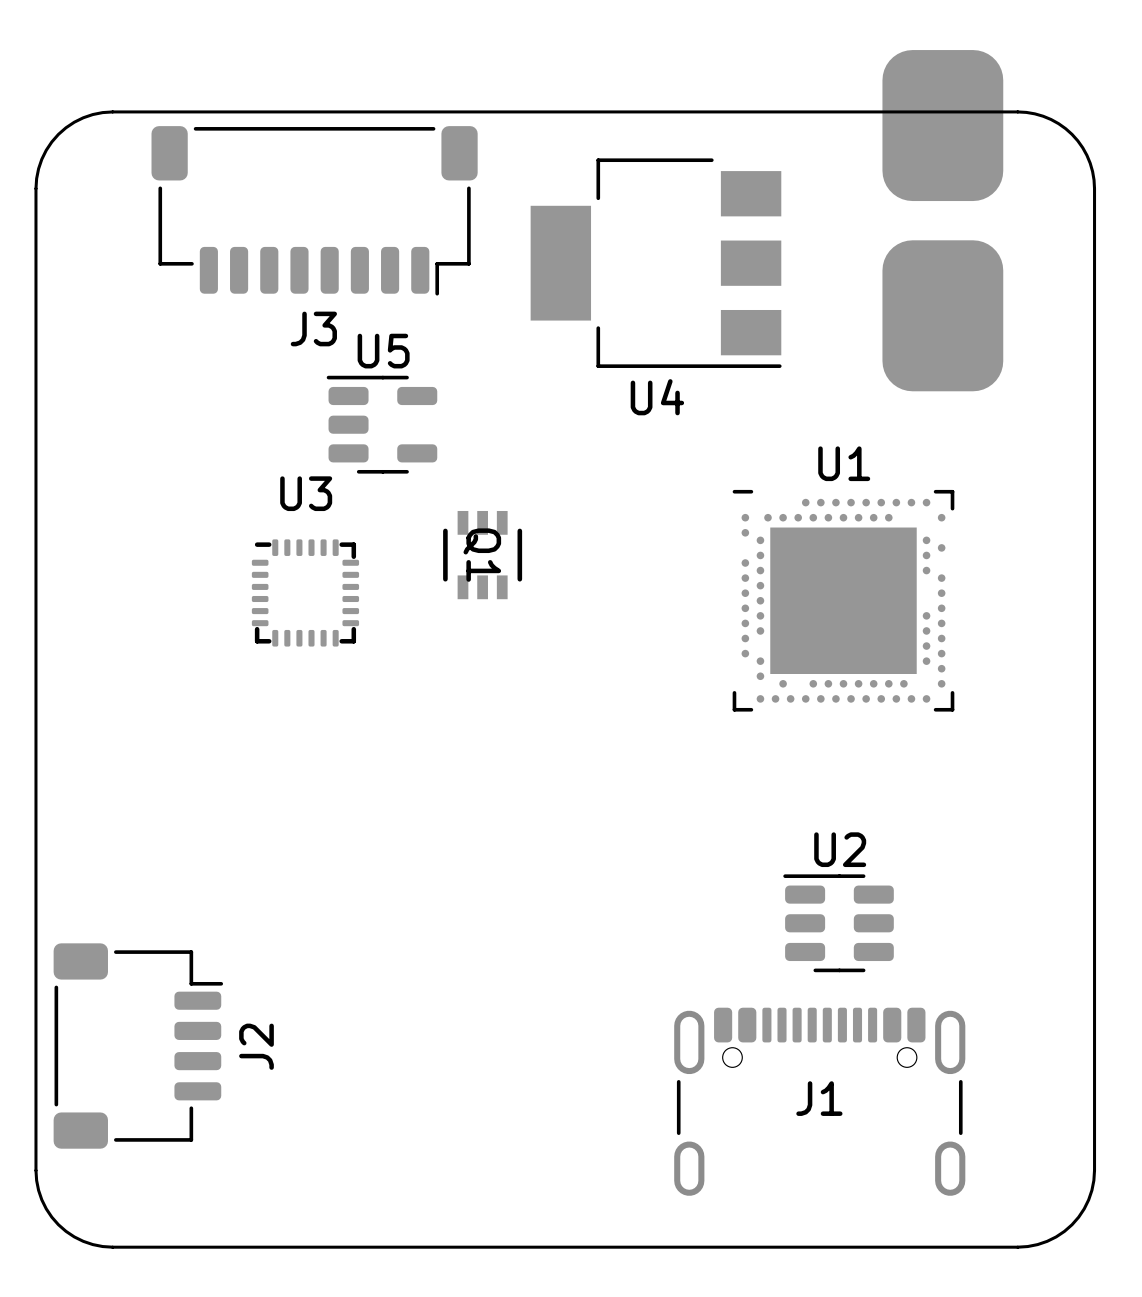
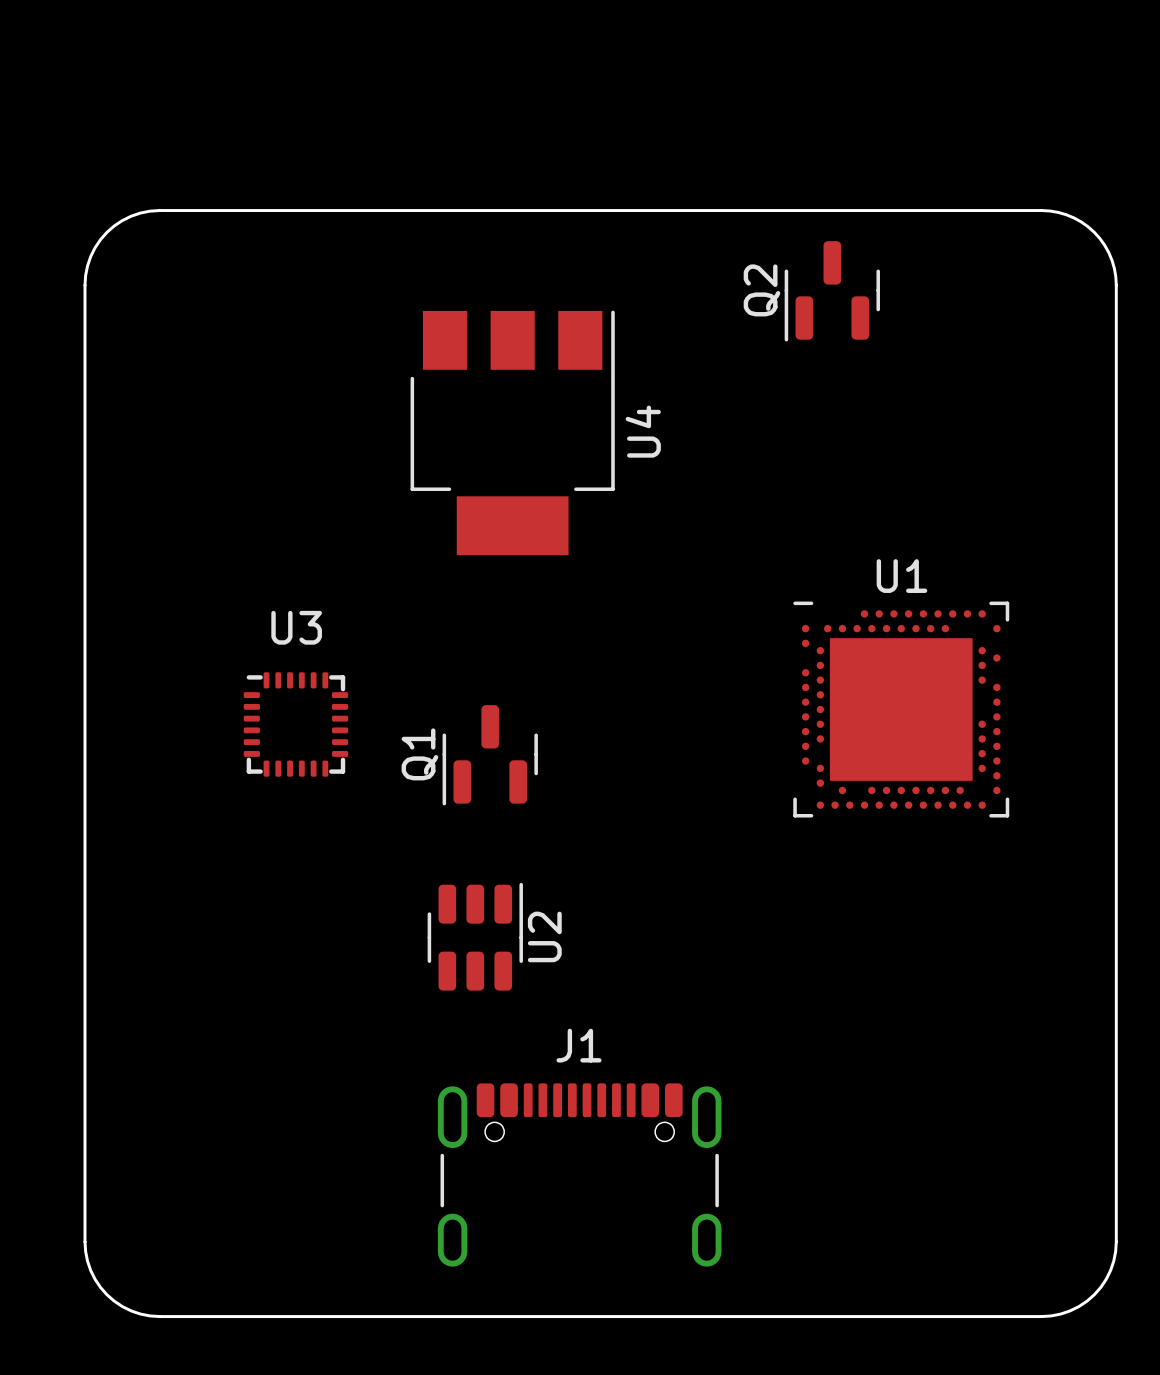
Q2: none -> (832, 291)
J3: (314, 210) -> none
part: (942, 220) -> none
U4 rotation: 0° (656, 263) -> 90° counterclockwise (512, 432)
U4 position: (656, 263) -> (512, 432)
U5: (381, 424) -> none
Q1 footprint: [443, 510, 523, 600] -> [442, 705, 538, 806]
Q1 name position: Q1 (482, 555) -> Q1 (419, 754)
U3 position: (305, 592) -> (295, 724)
U1 position: (843, 600) -> (901, 709)
U2 rotation: 0° (838, 923) -> 90° clockwise (475, 936)
U2 position: (838, 923) -> (475, 936)
J2: (138, 1046) -> none
J1 name position: J1 (819, 1098) -> J1 (578, 1045)
J1 position: (819, 1101) -> (579, 1174)

